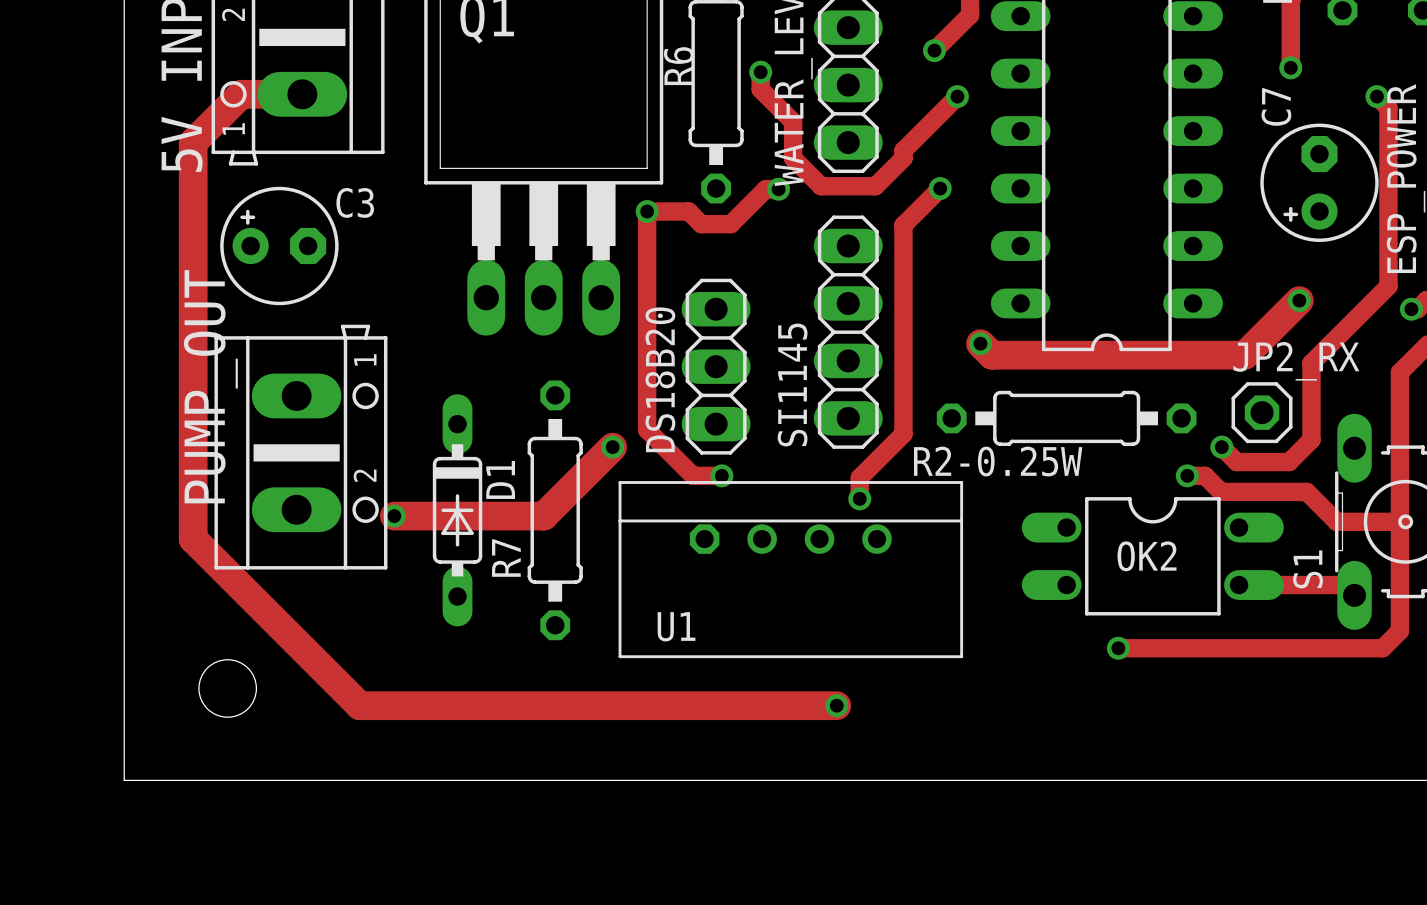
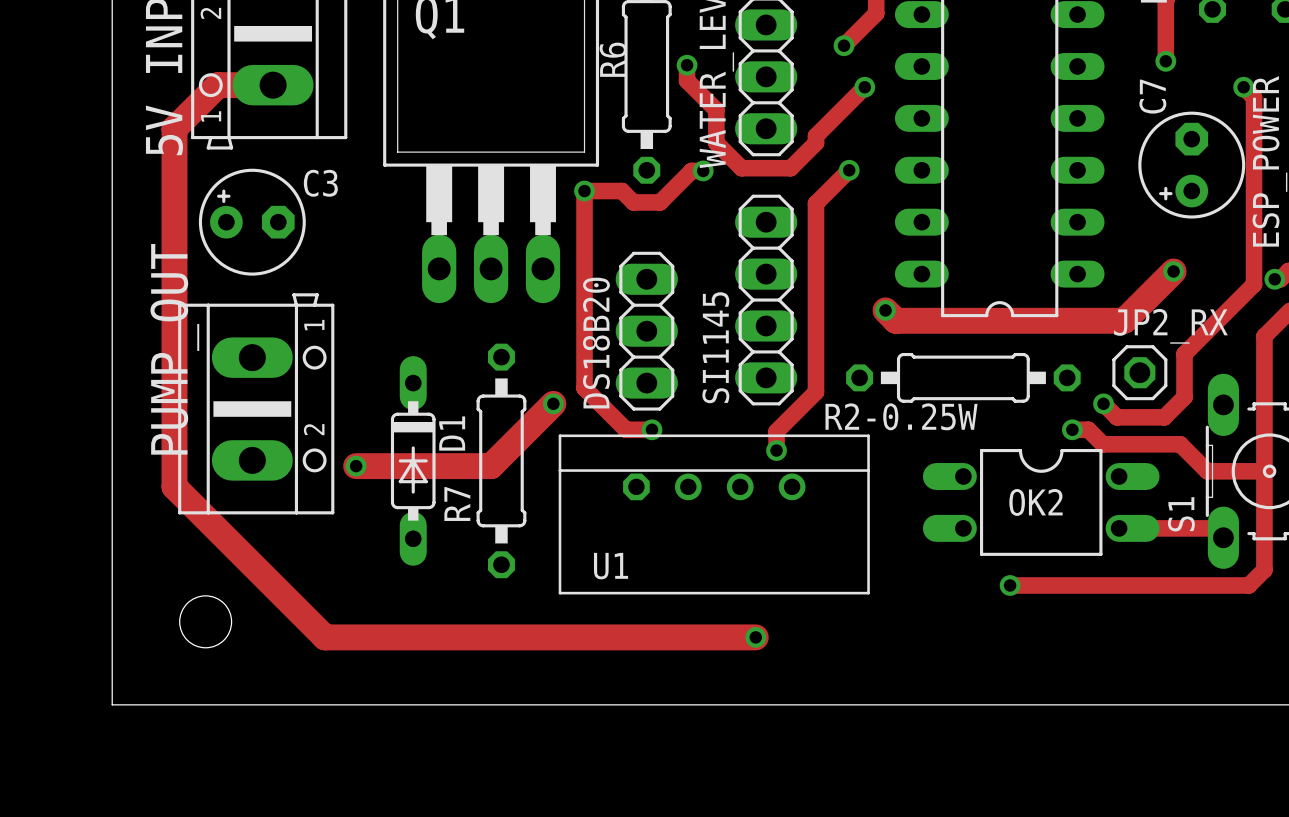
track: (1388, 286) (1311, 363) (1311, 391) -> (1254, 258) (1254, 284) (1184, 354)
PUMP_OUT position: (300, 447) -> (256, 403)

